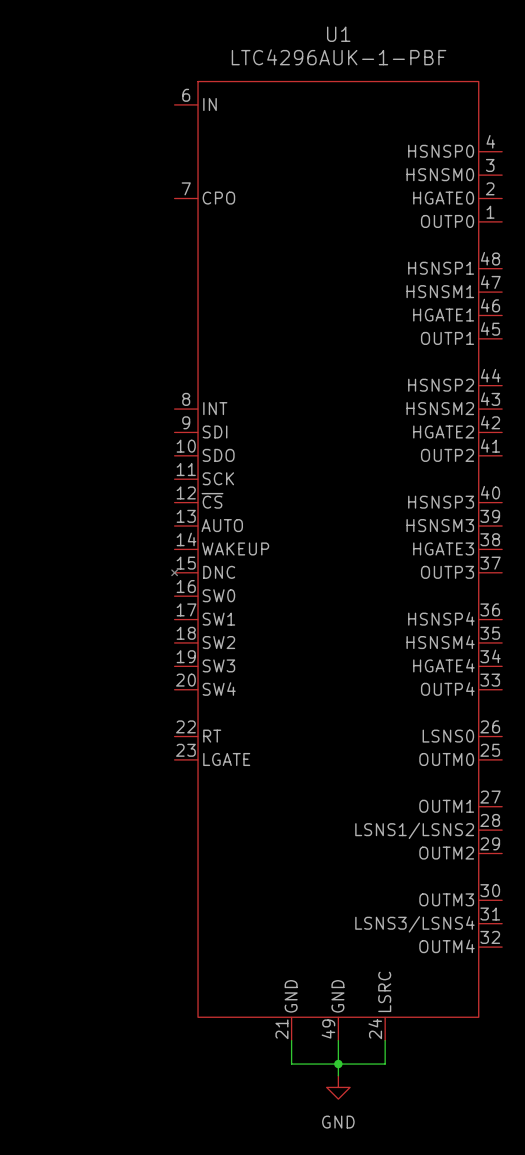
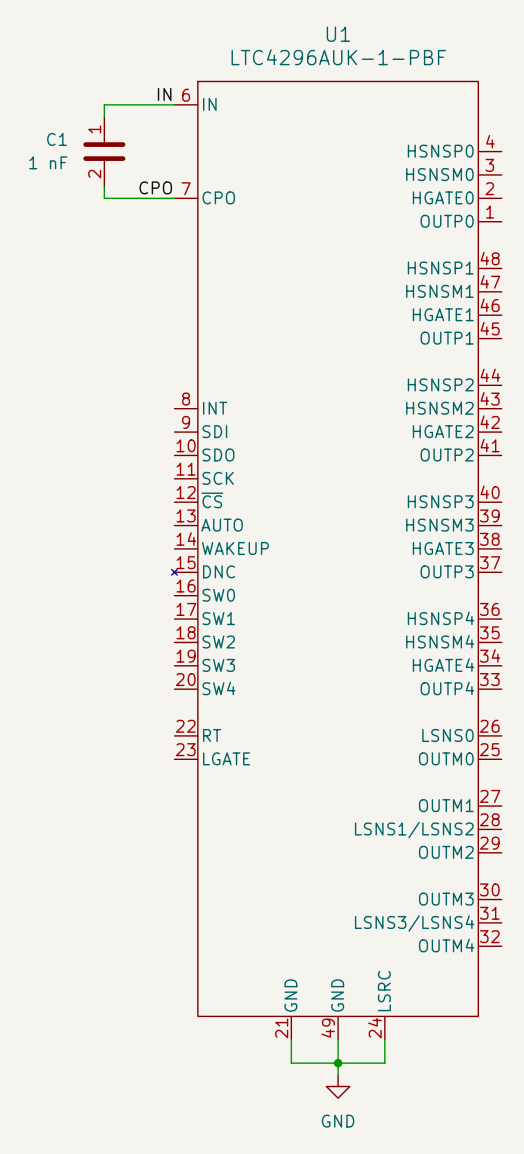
label: none -> IN (164, 94)
wire: none -> (174, 104) (104, 104) (104, 116)
C1: none -> 1 nF (104, 151)
wire: none -> (104, 186) (104, 198) (174, 198)
label: none -> CPO (155, 187)

